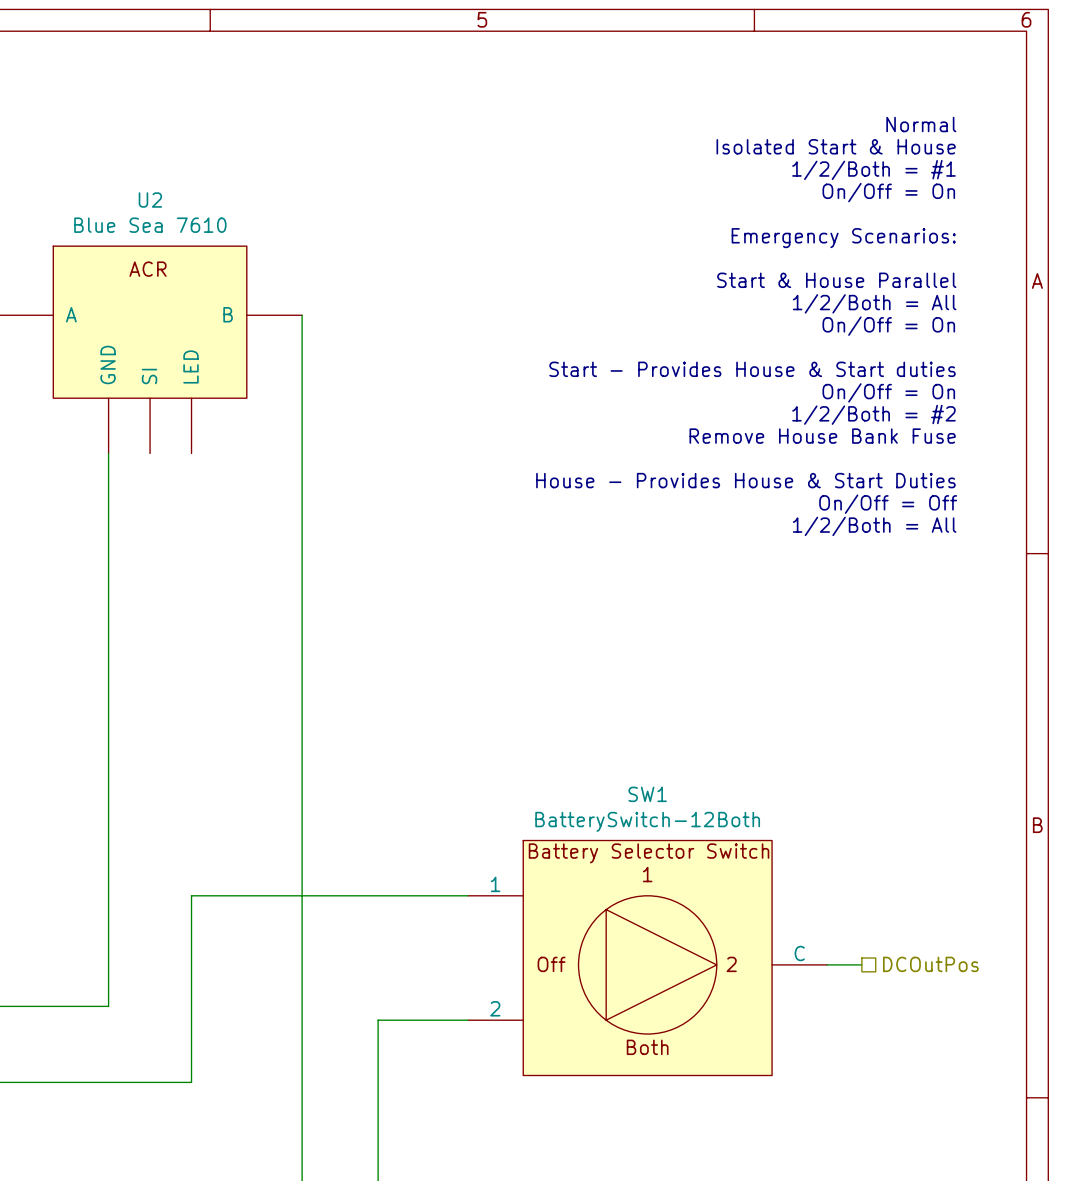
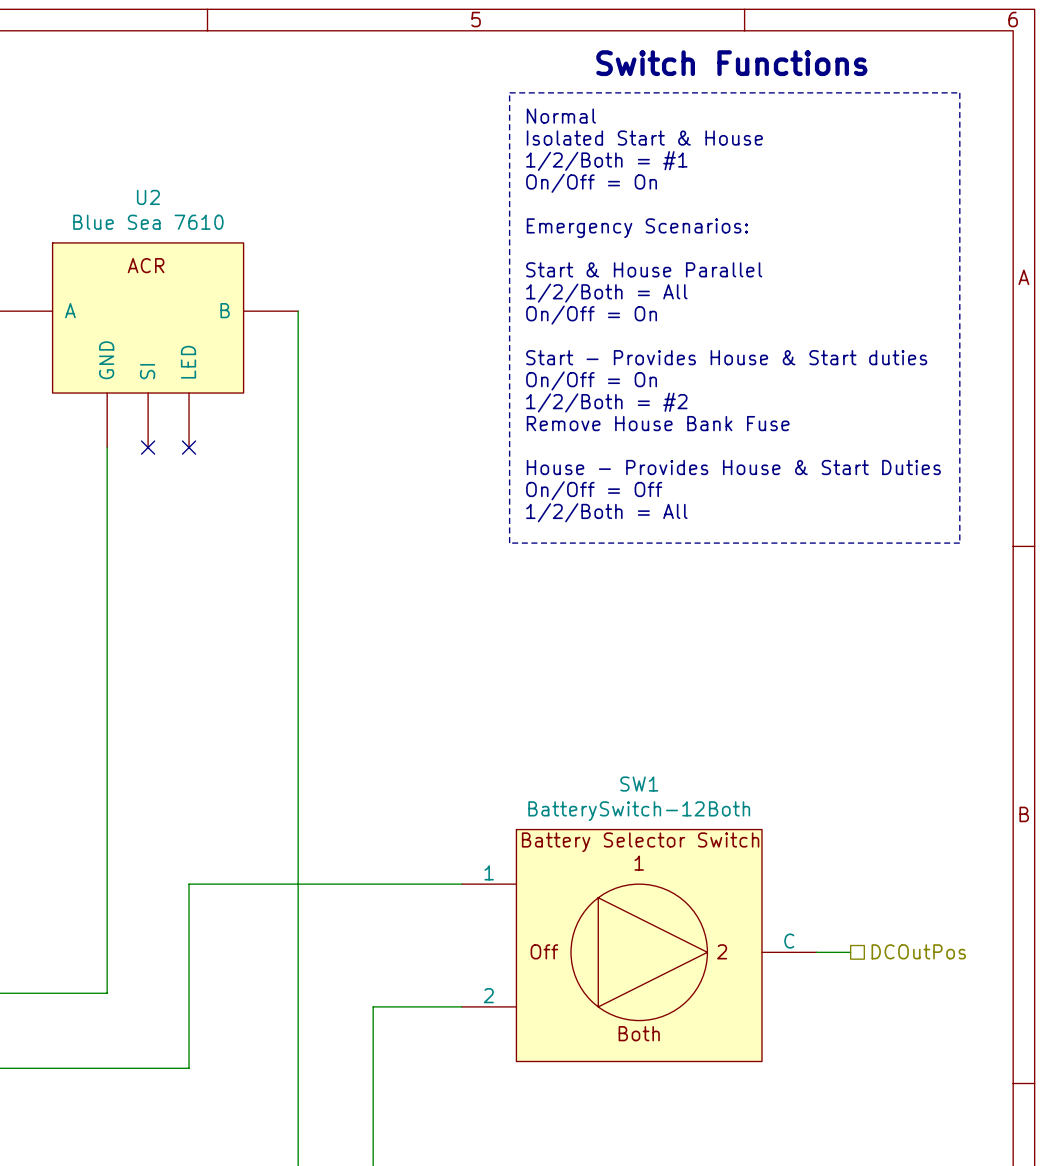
text: none -> Switch Functions (731, 63)
line: none -> (509, 92) (509, 543) (959, 543) (959, 92) (509, 92)
text: none -> Normal (561, 116)
text: Normal (921, 124) -> none
text: none -> Isolated Start & House (644, 138)
text: Isolated Start & House (836, 146) -> none
text: none -> 1/2/Both = #1 (606, 160)
text: 1/2/Both = #1 (873, 170) -> none
text: none -> On/Off = On (591, 183)
text: On/Off = On (888, 192) -> none
text: none -> Emergency Scenarios: (637, 228)
text: Emergency Scenarios: (843, 238) -> none
text: none -> Start & House Parallel (644, 269)
text: Start & House Parallel (836, 280) -> none
text: none -> 1/2/Both = All (606, 293)
text: 1/2/Both = All (874, 303) -> none
text: none -> On/Off = On (591, 315)
text: On/Off = On (888, 326) -> none
text: none -> Start - Provides House & Start duties (726, 357)
text: Start - Provides House & Start duties (752, 369) -> none
text: none -> On/Off = On (591, 380)
text: On/Off = On (888, 392) -> none
text: none -> 1/2/Both = #2 (606, 402)
text: 1/2/Both = #2 (873, 414) -> none
text: none -> Remove House Bank Fuse (658, 423)
text: Remove House Bank Fuse (822, 436) -> none
no-connect mark: none -> (148, 447)
no-connect mark: none -> (189, 447)
text: none -> House - Provides House & Start Duties (733, 467)
text: House - Provides House & Start Duties (745, 480) -> none
text: none -> On/Off = Off (594, 490)
text: On/Off = Off (888, 504) -> none
text: none -> 1/2/Both = All (606, 512)
text: 1/2/Both = All (874, 526) -> none

